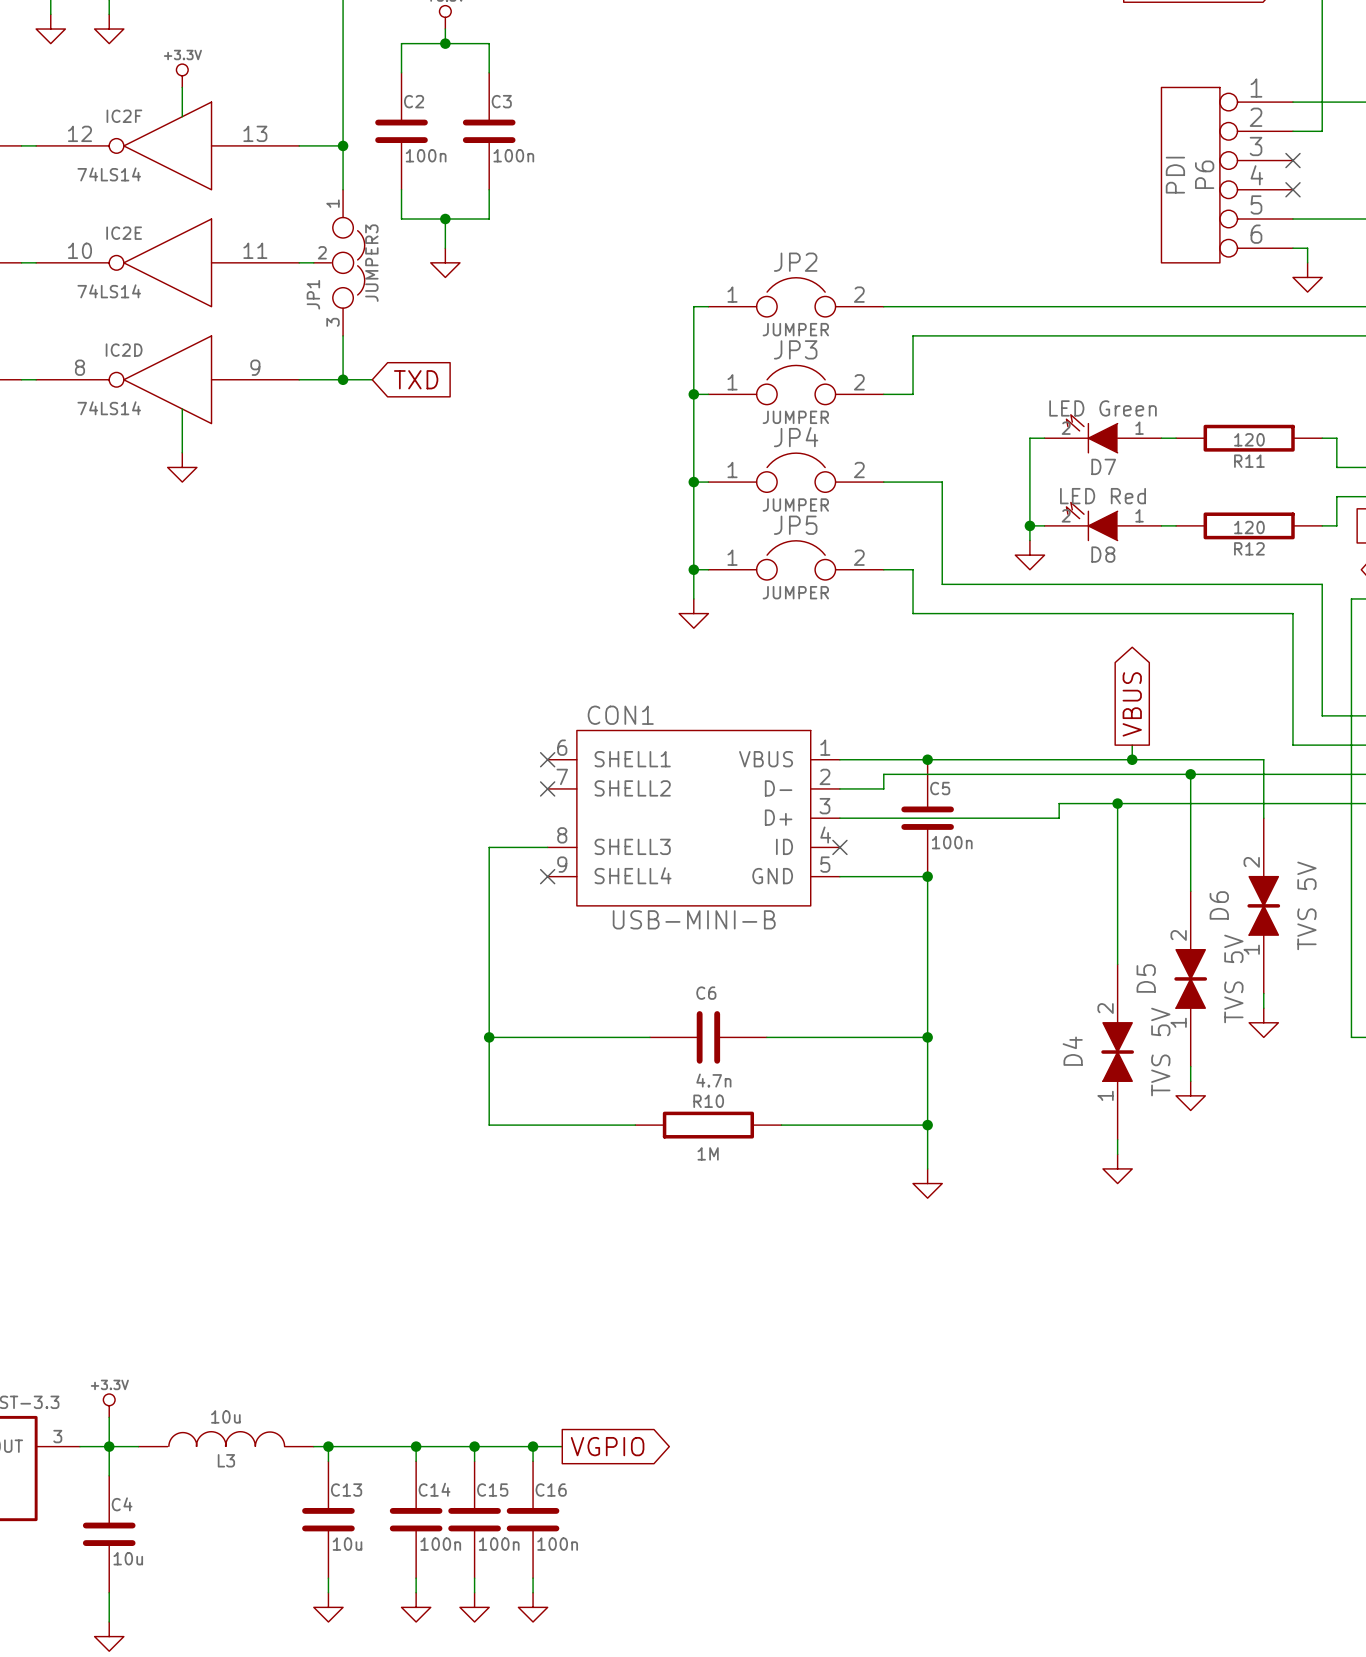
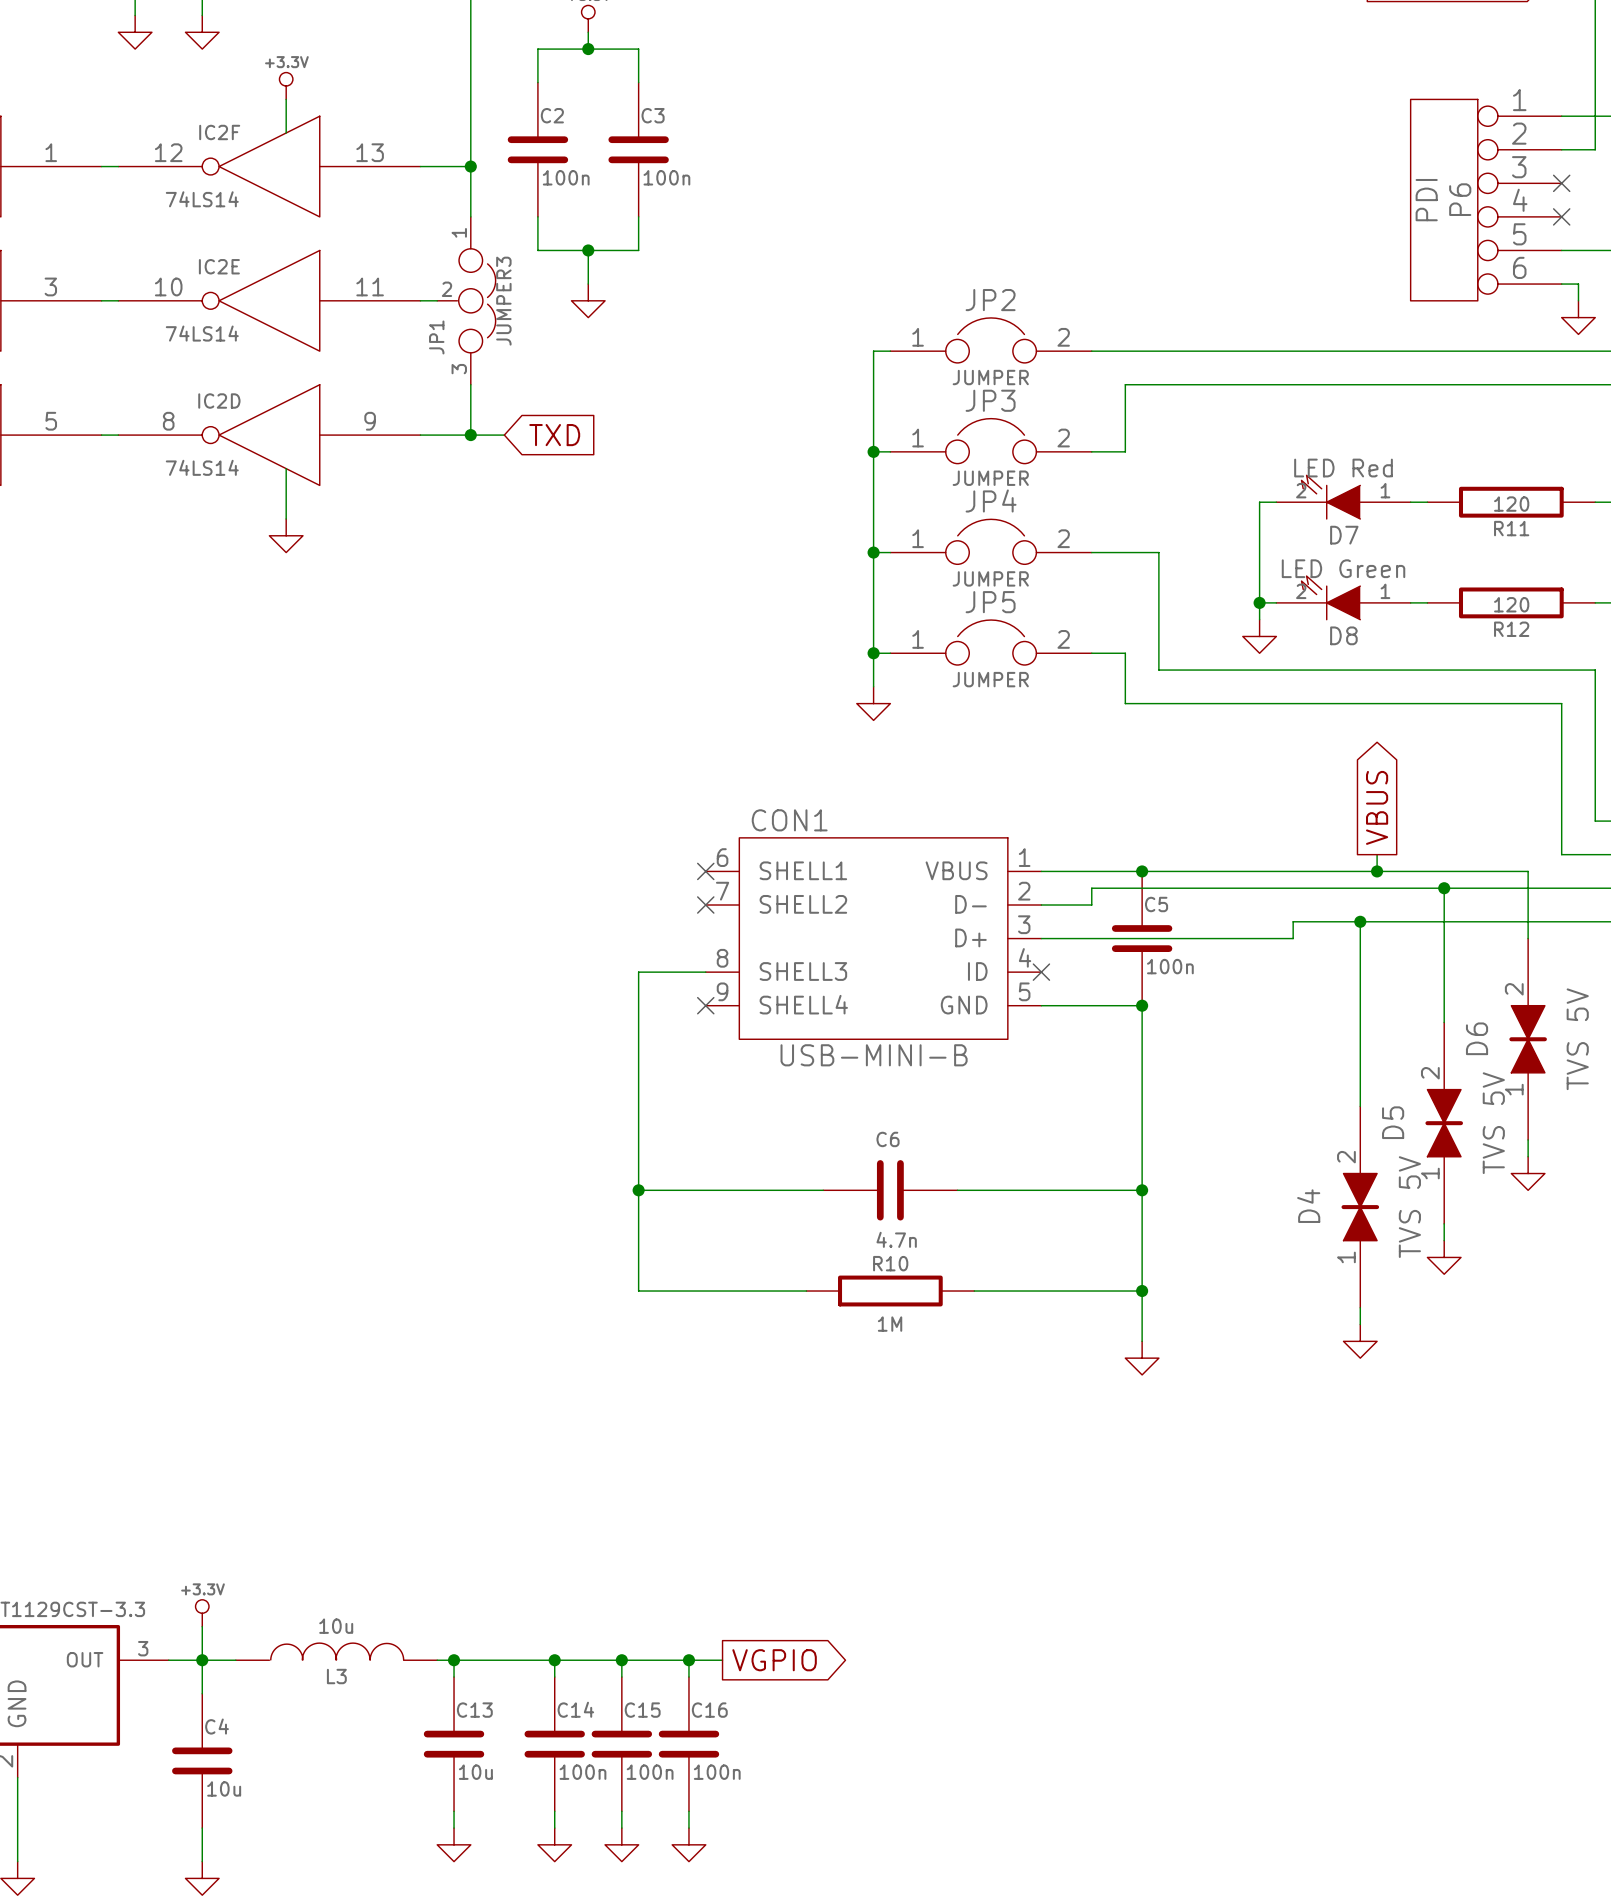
D7 value: LED Green (1103, 408) -> LED Red (1343, 468)
D8 value: LED Red (1103, 496) -> LED Green (1343, 568)

